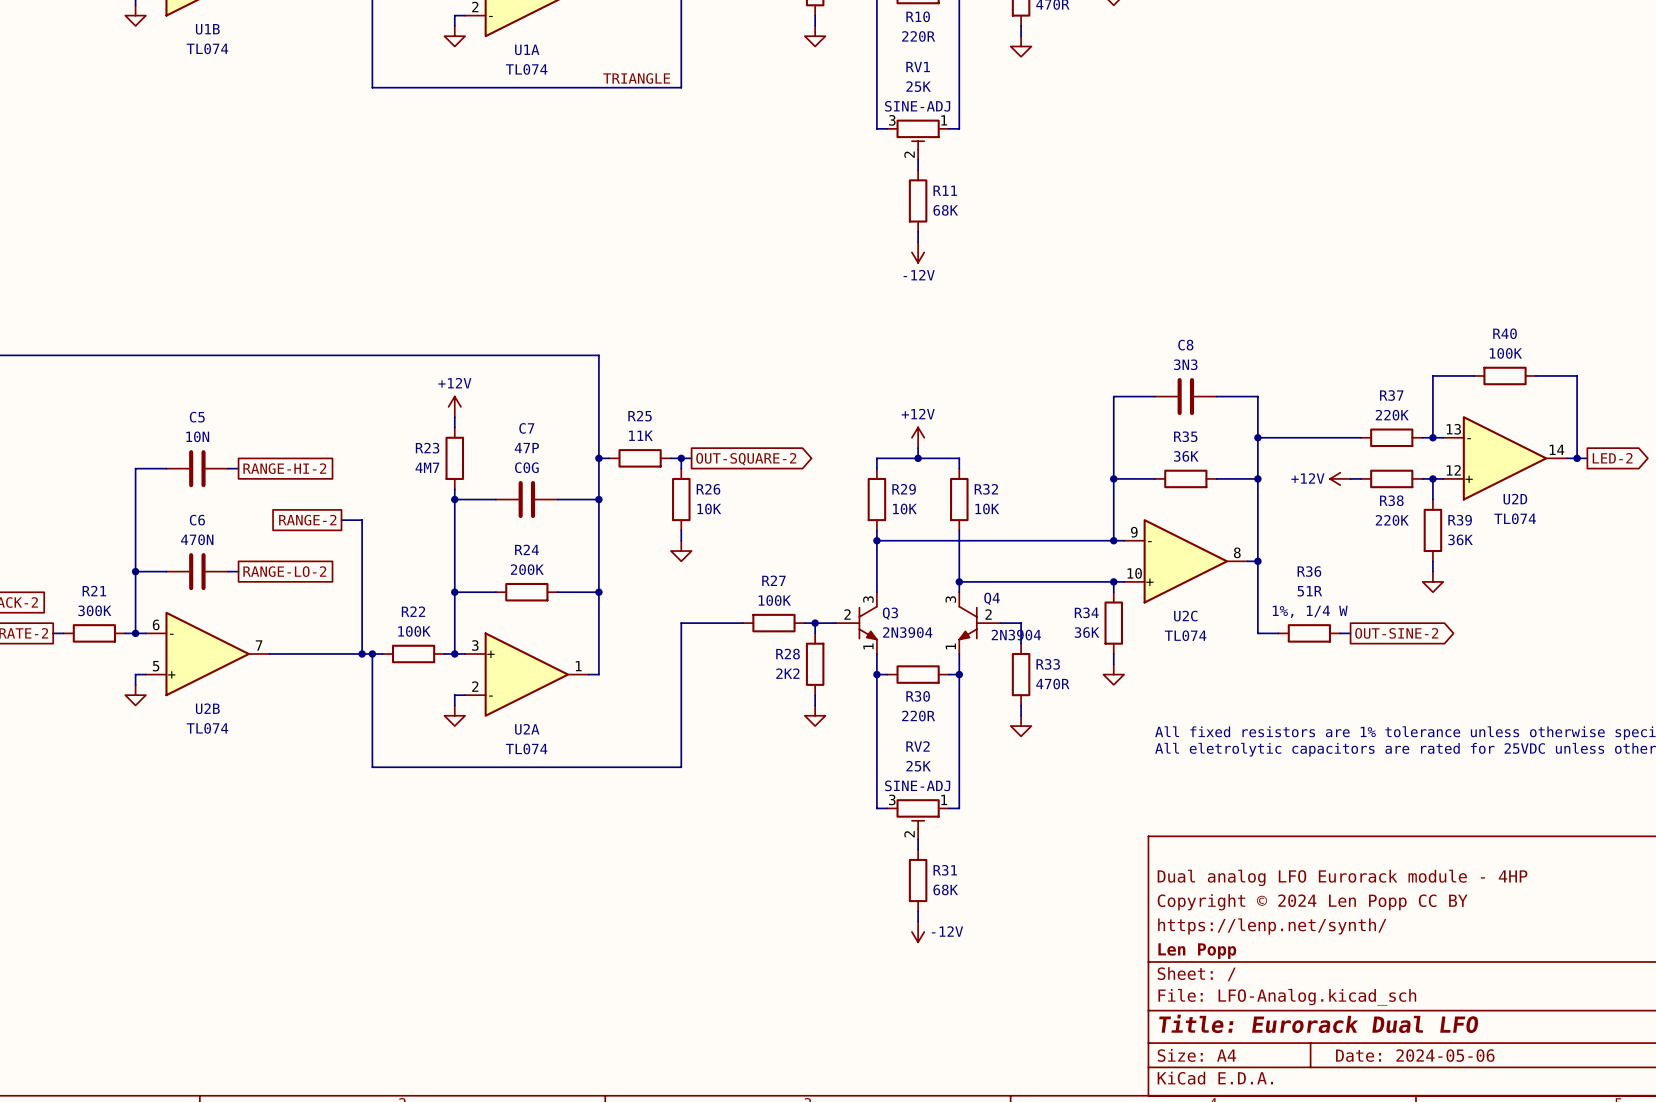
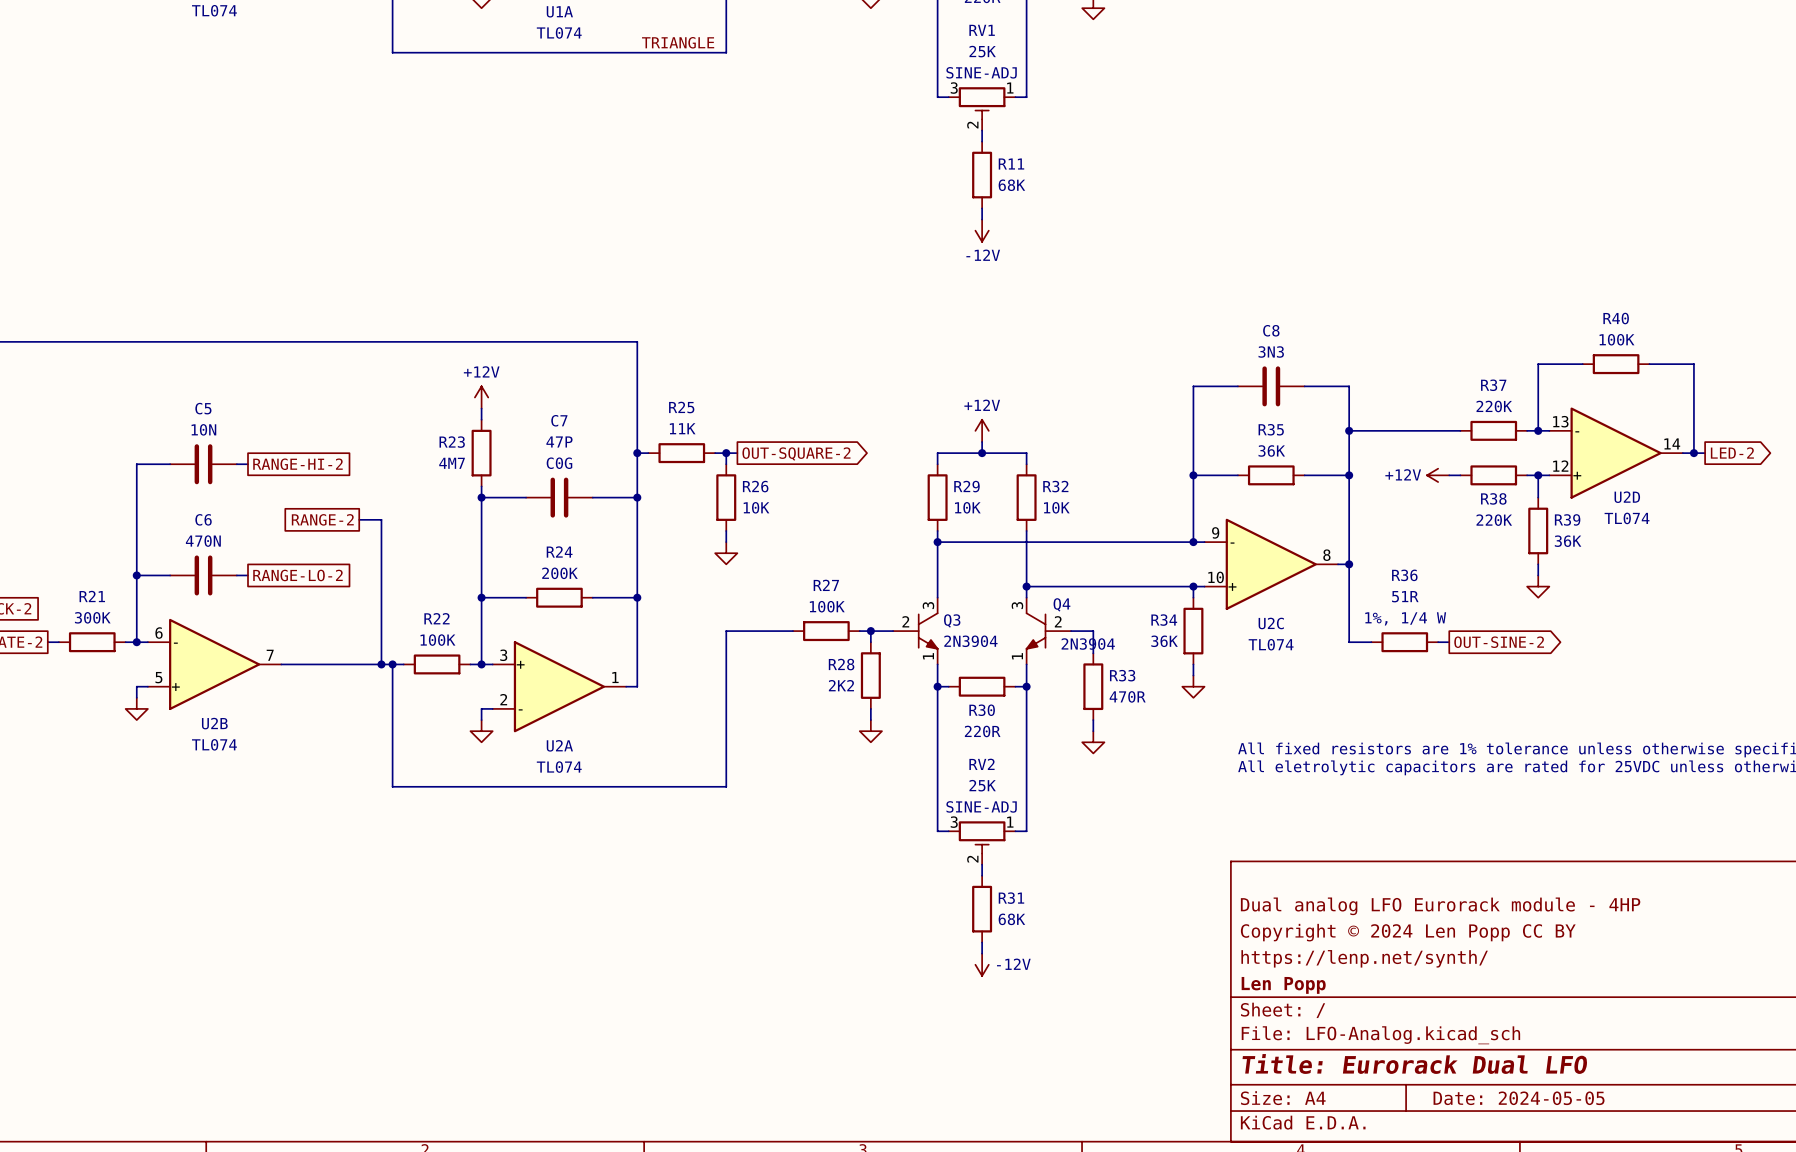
title block: Date: 2024-05-06 (1415, 1055) -> Date: 2024-05-05 (1519, 1098)

